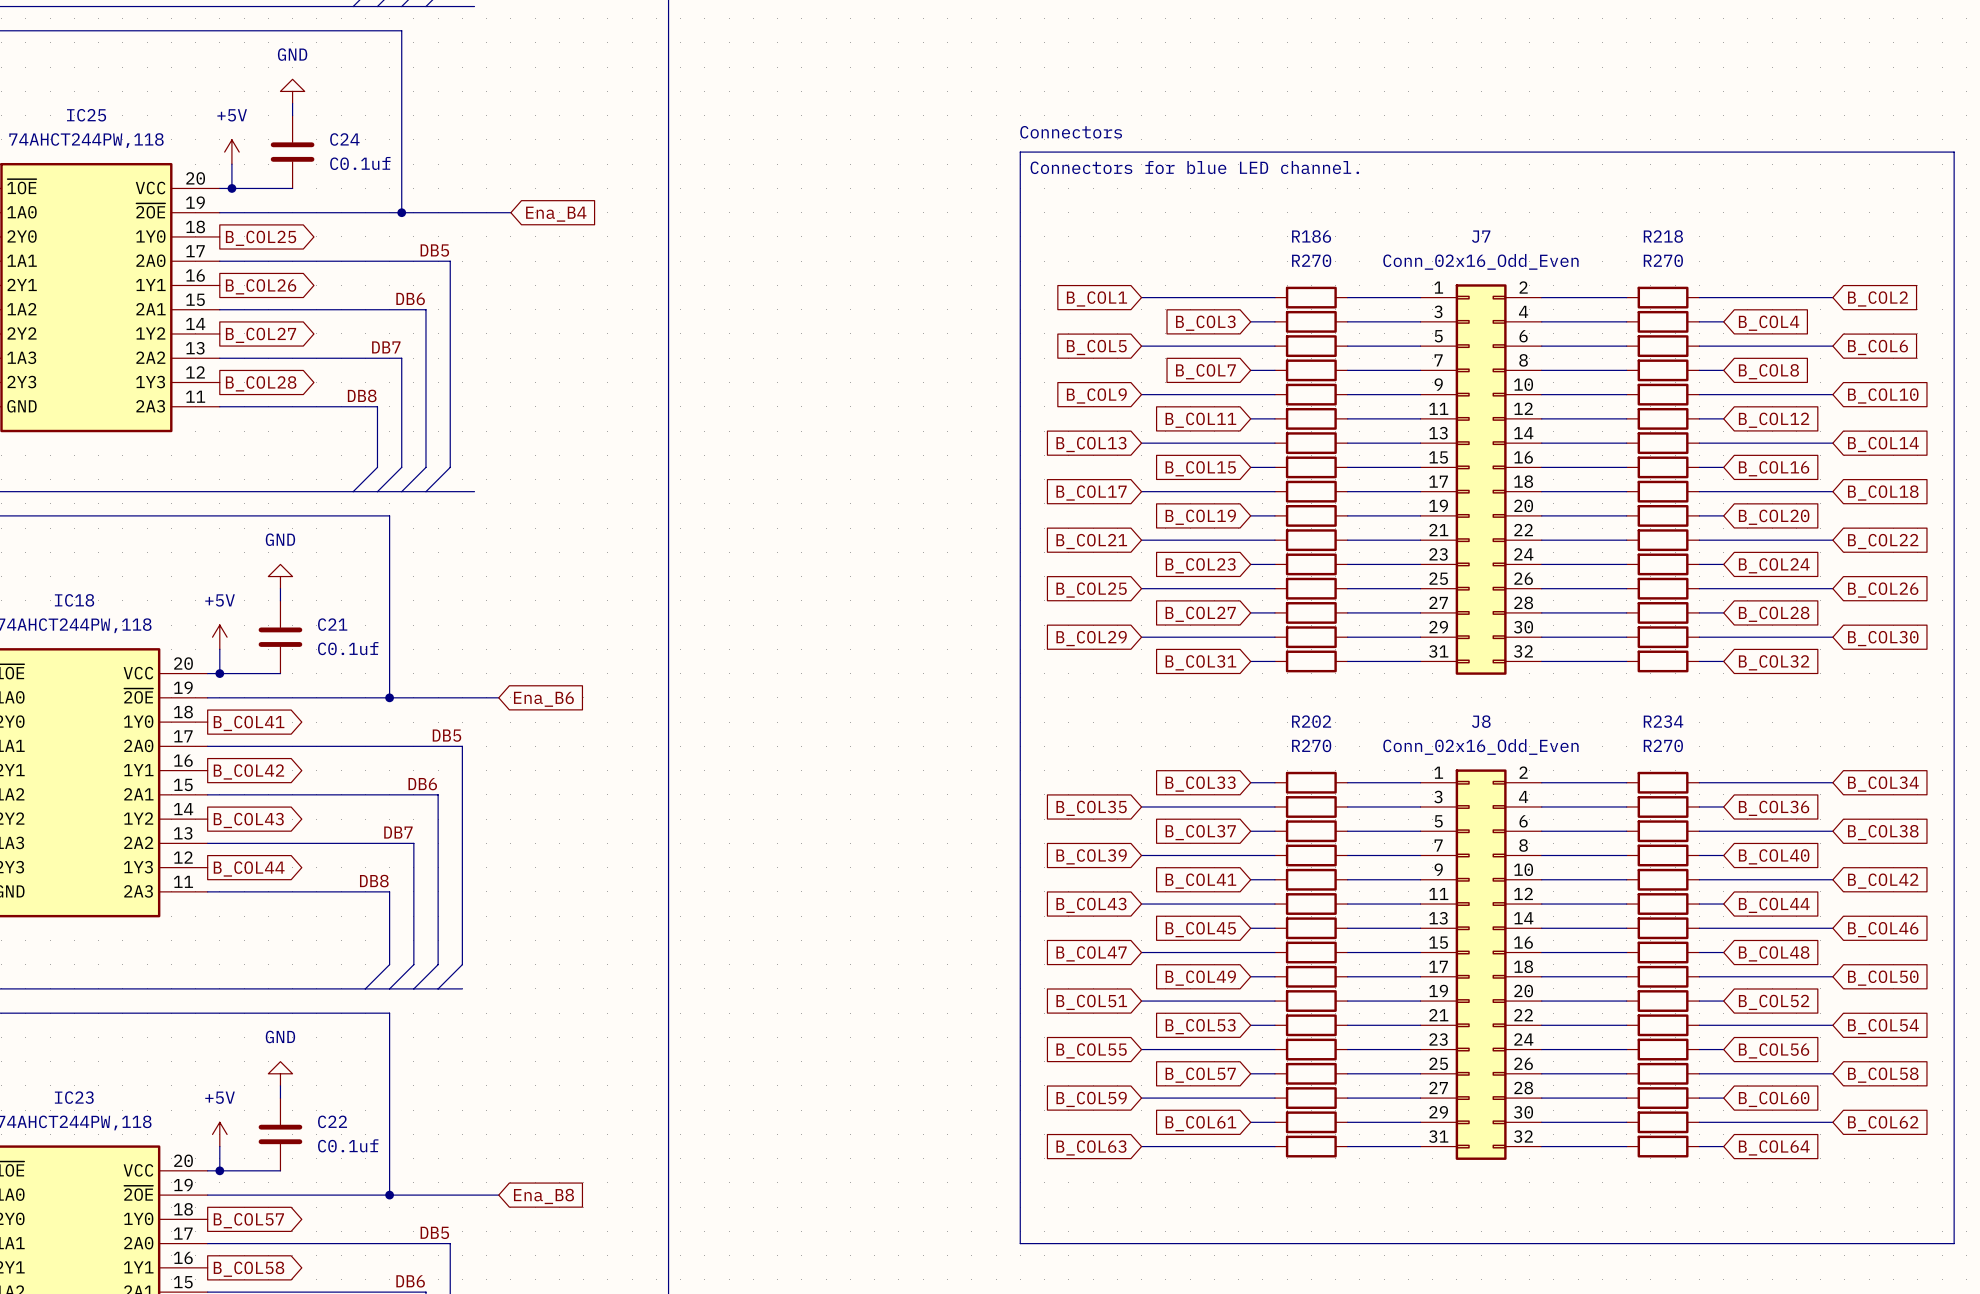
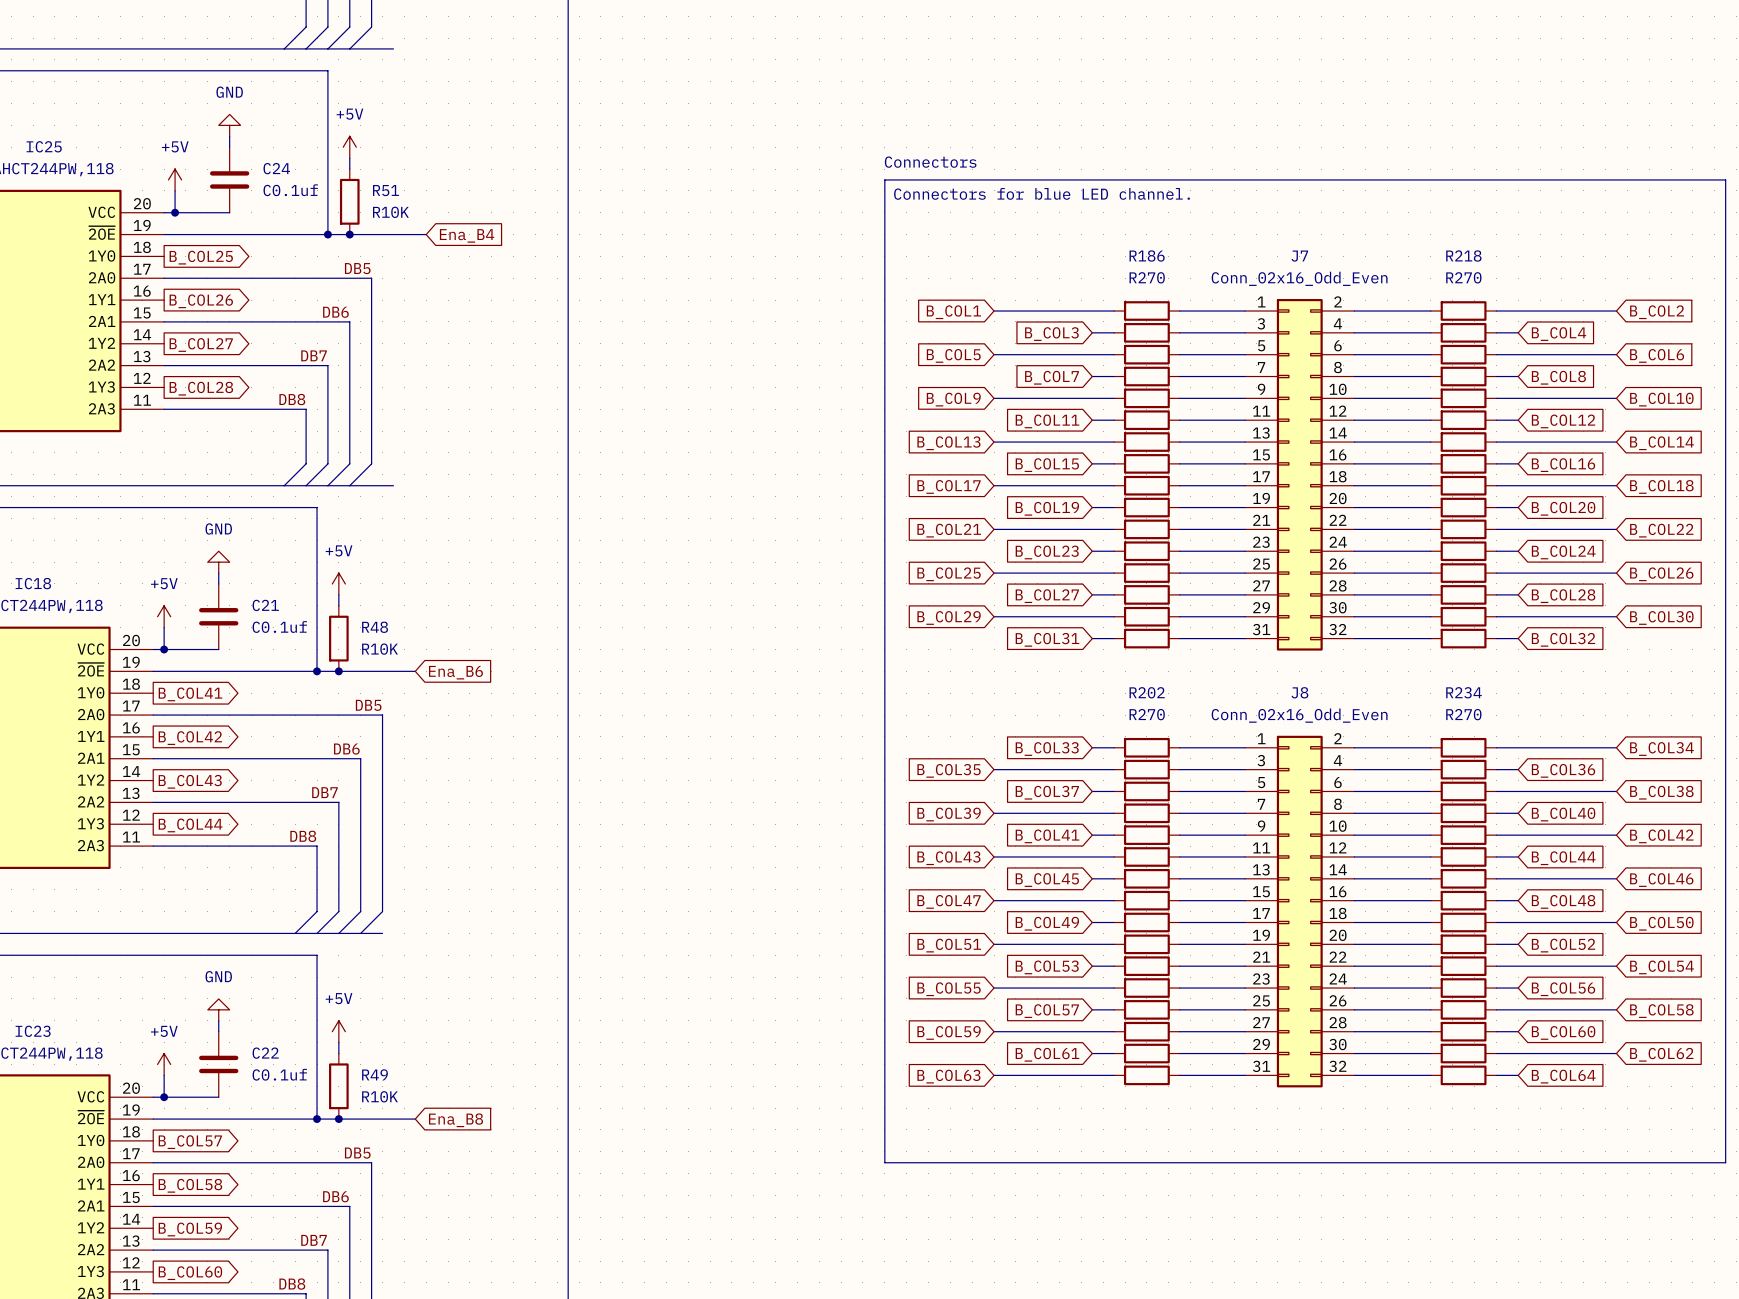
power symbol: none -> +5V (349, 147)
wire: none -> (349, 158) (349, 169)
R51: none -> R10K (349, 201)
junction: none -> (349, 234)
power symbol: none -> +5V (338, 583)
wire: none -> (338, 594) (338, 605)
R48: none -> R10K (338, 638)
junction: none -> (338, 671)
power symbol: none -> +5V (338, 1031)
wire: none -> (338, 1042) (338, 1053)
R49: none -> R10K (338, 1086)
junction: none -> (338, 1119)

